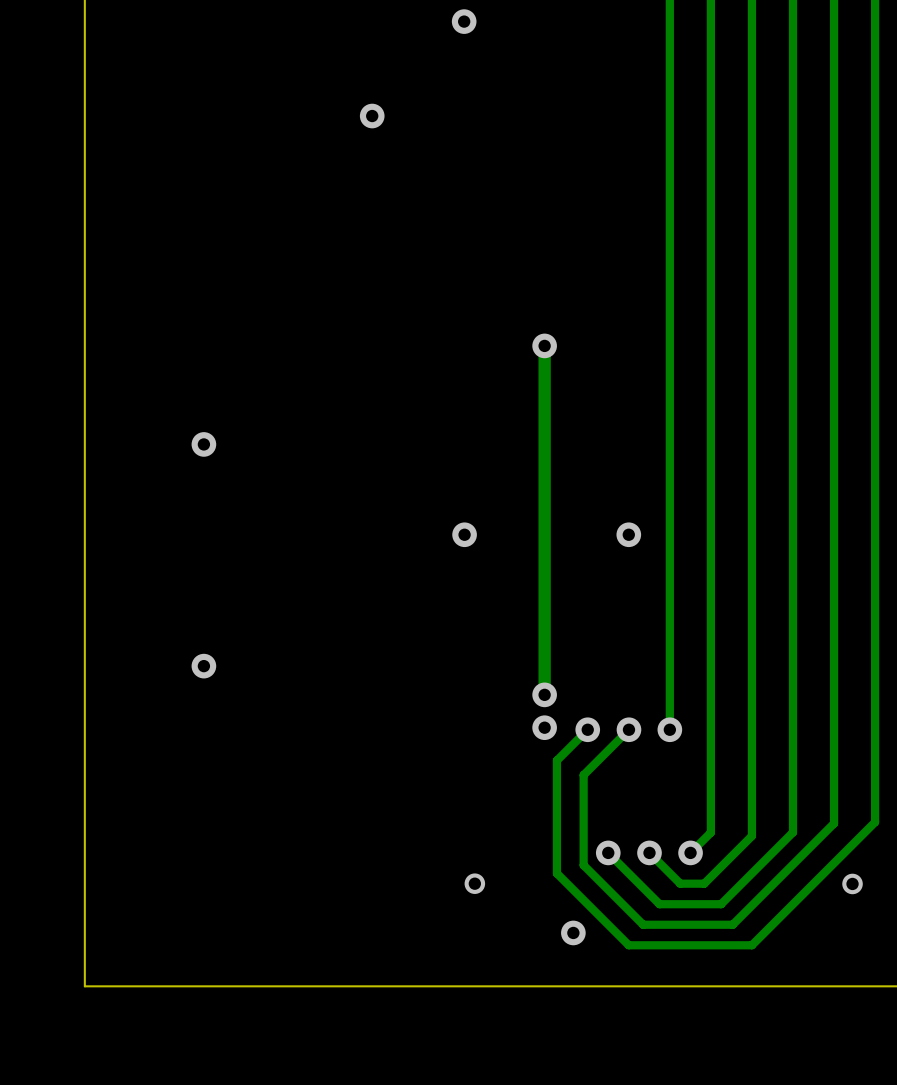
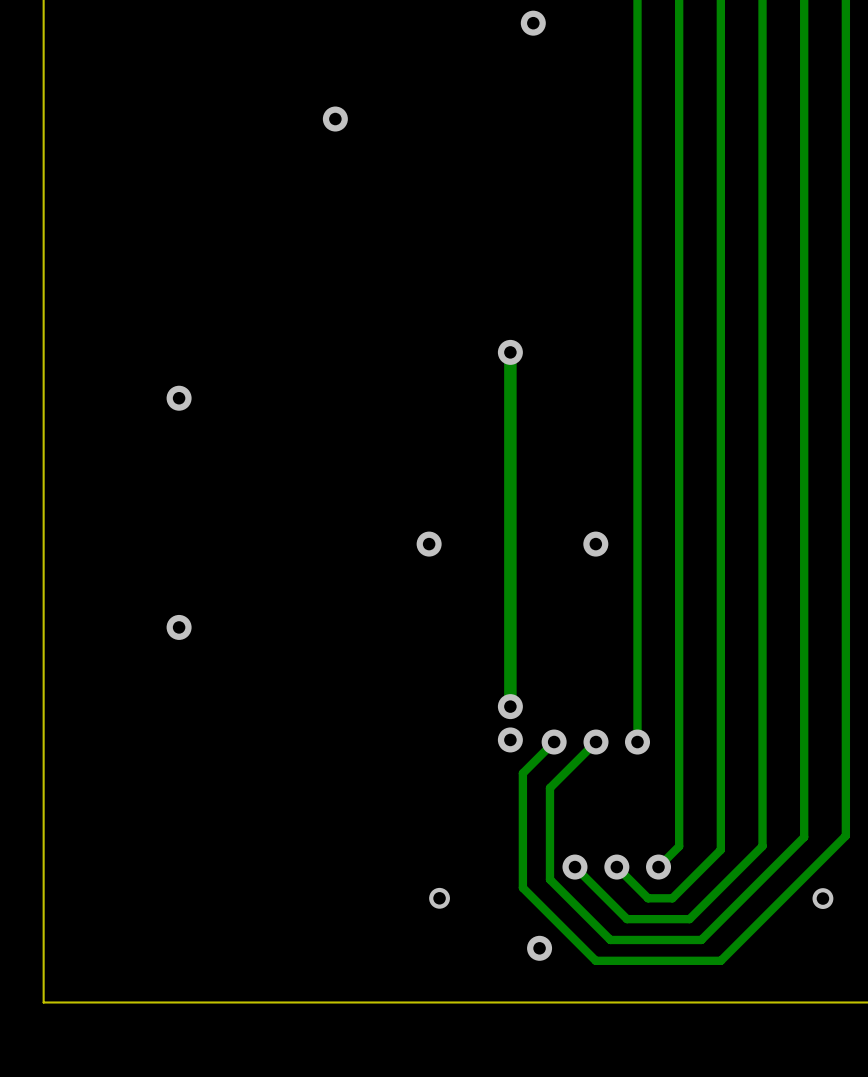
via position: (464, 21) -> (533, 23)
via position: (203, 444) -> (179, 398)
via position: (203, 666) -> (179, 627)

